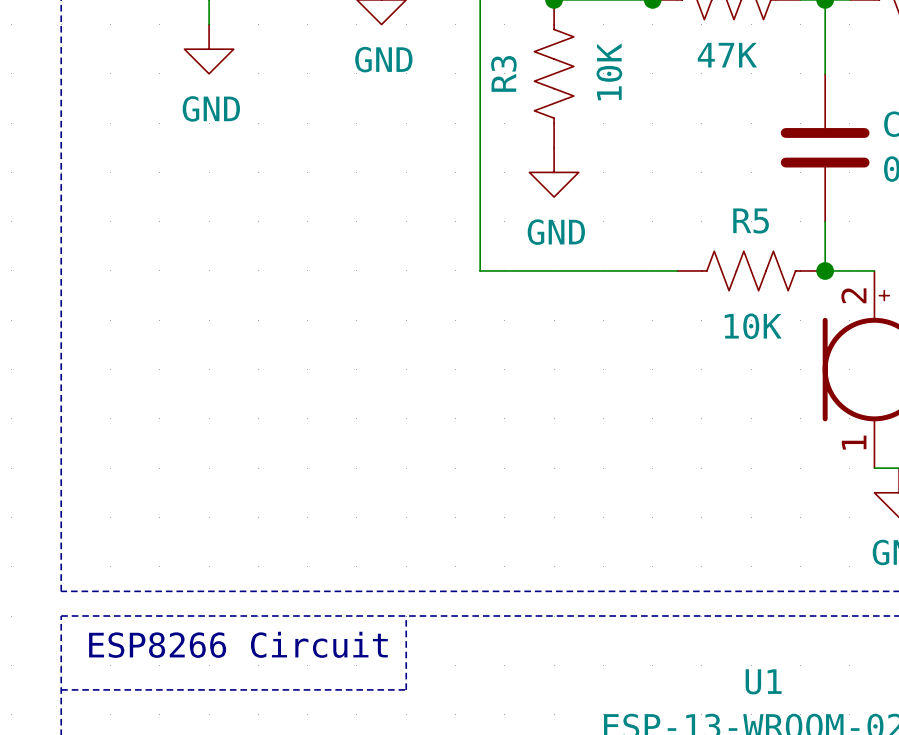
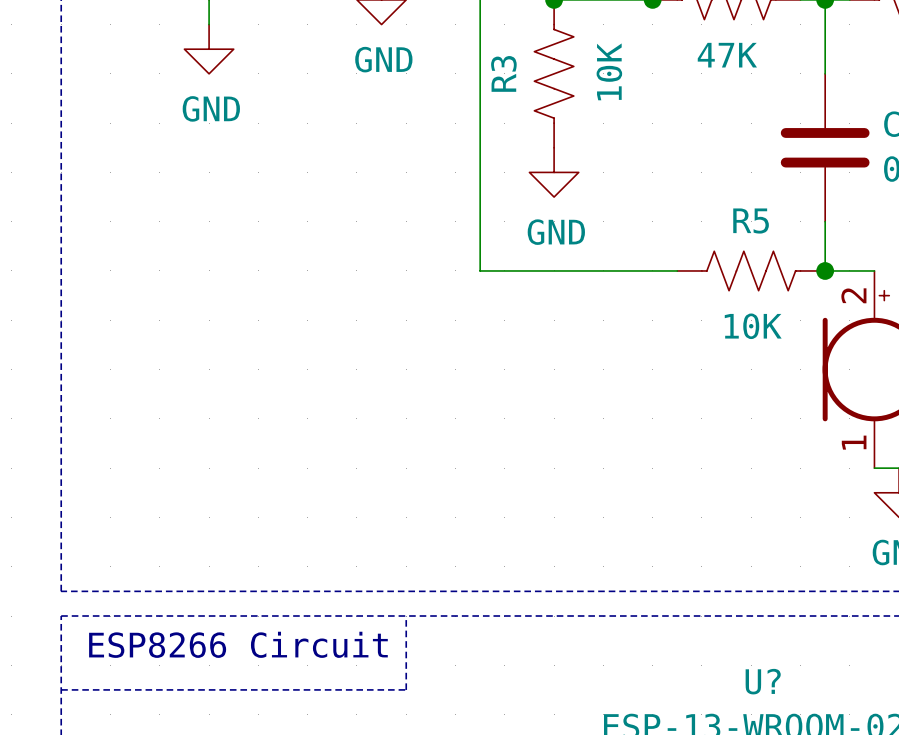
U1 name: U1 (763, 681) -> U? (763, 681)

